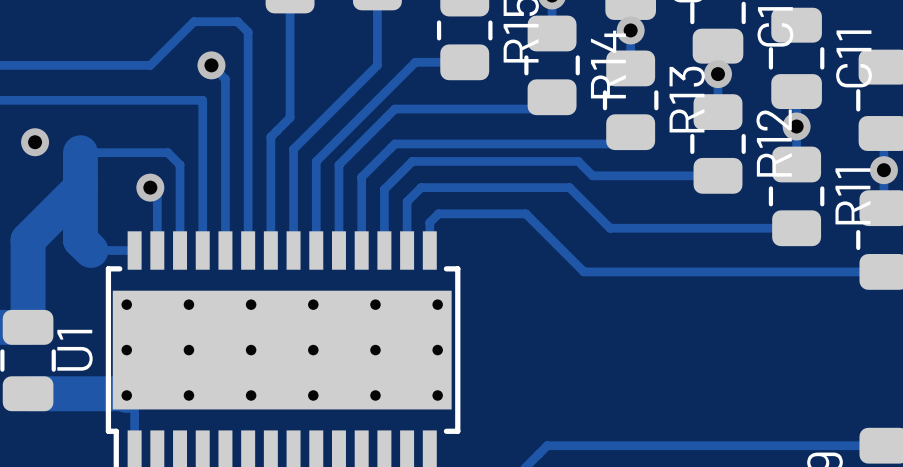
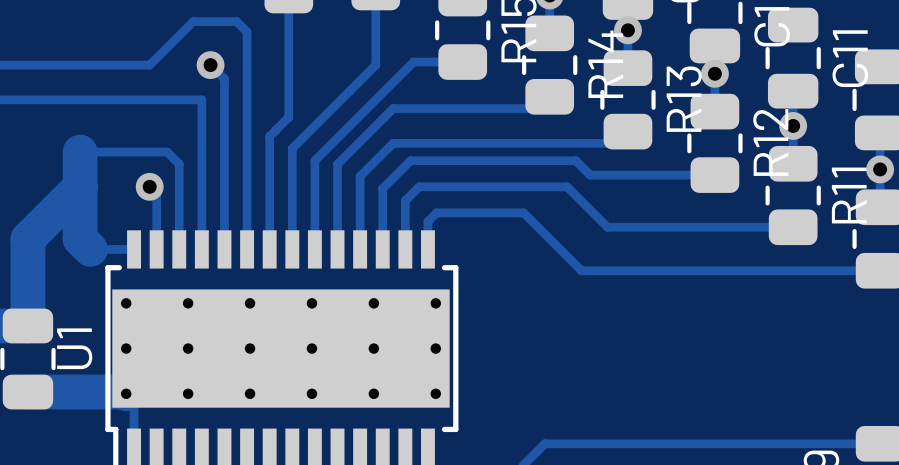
via: (35, 142) -> none

